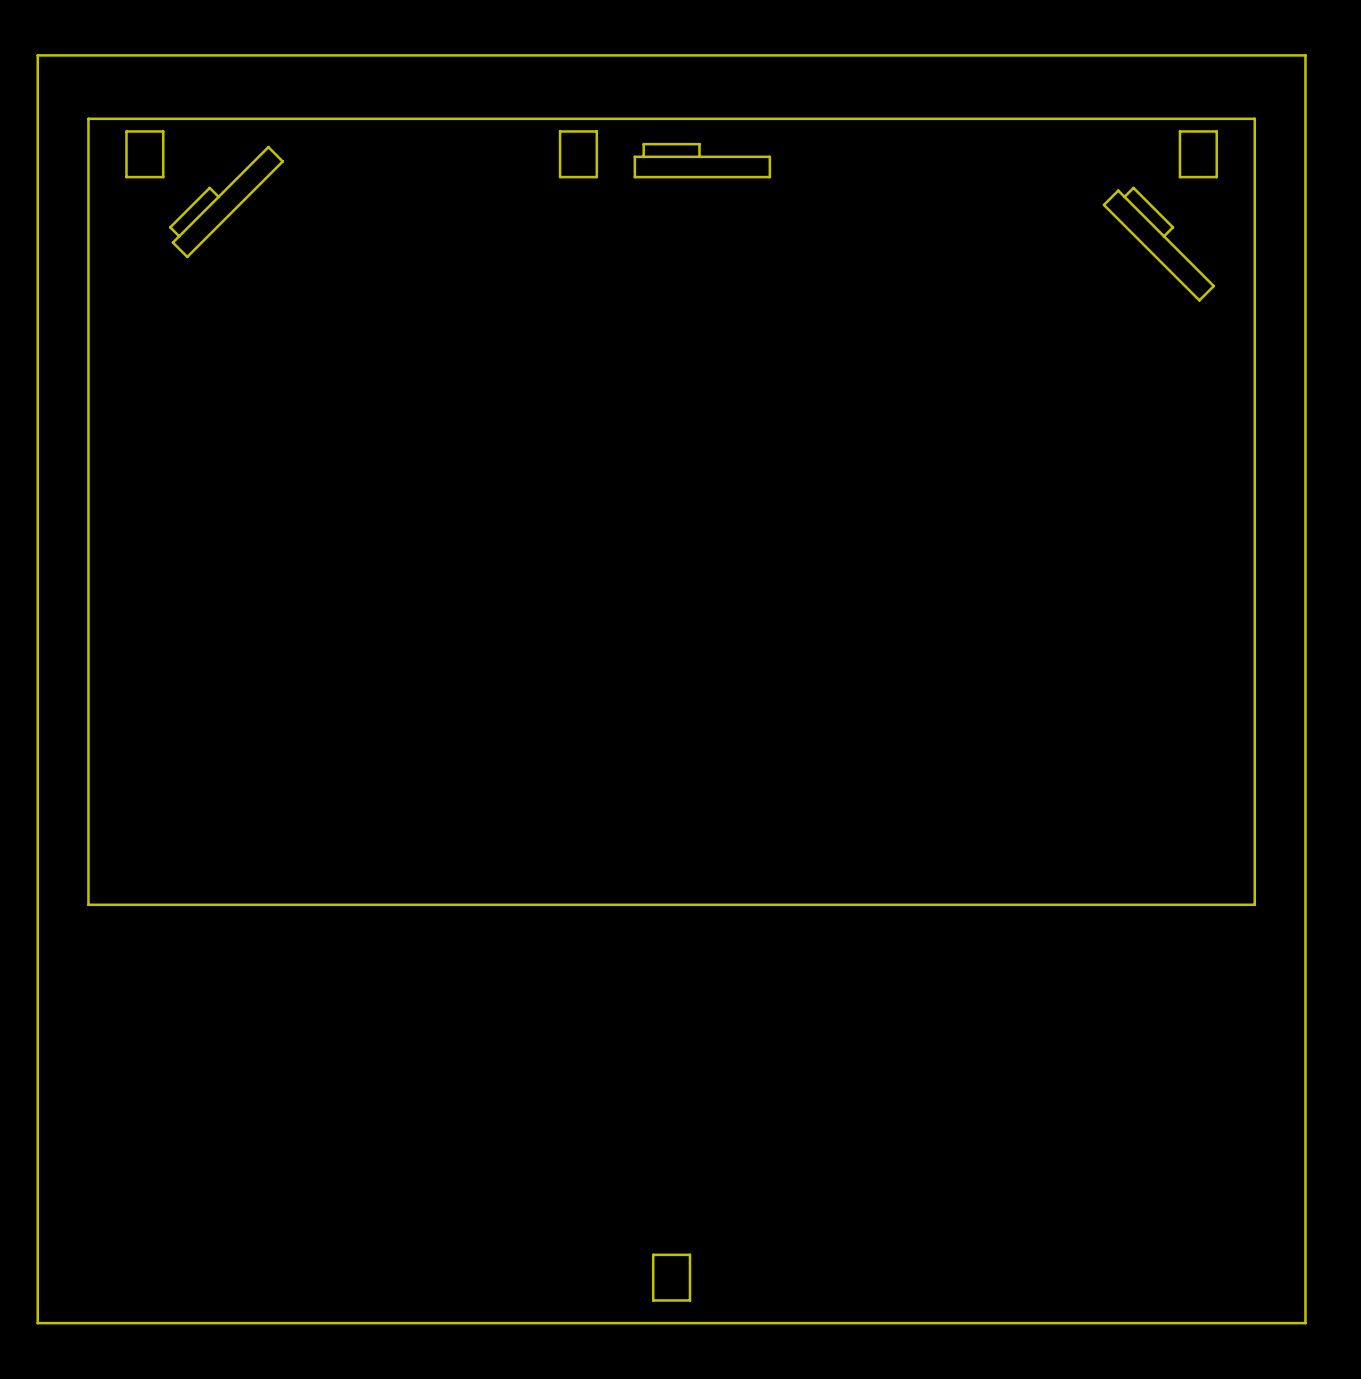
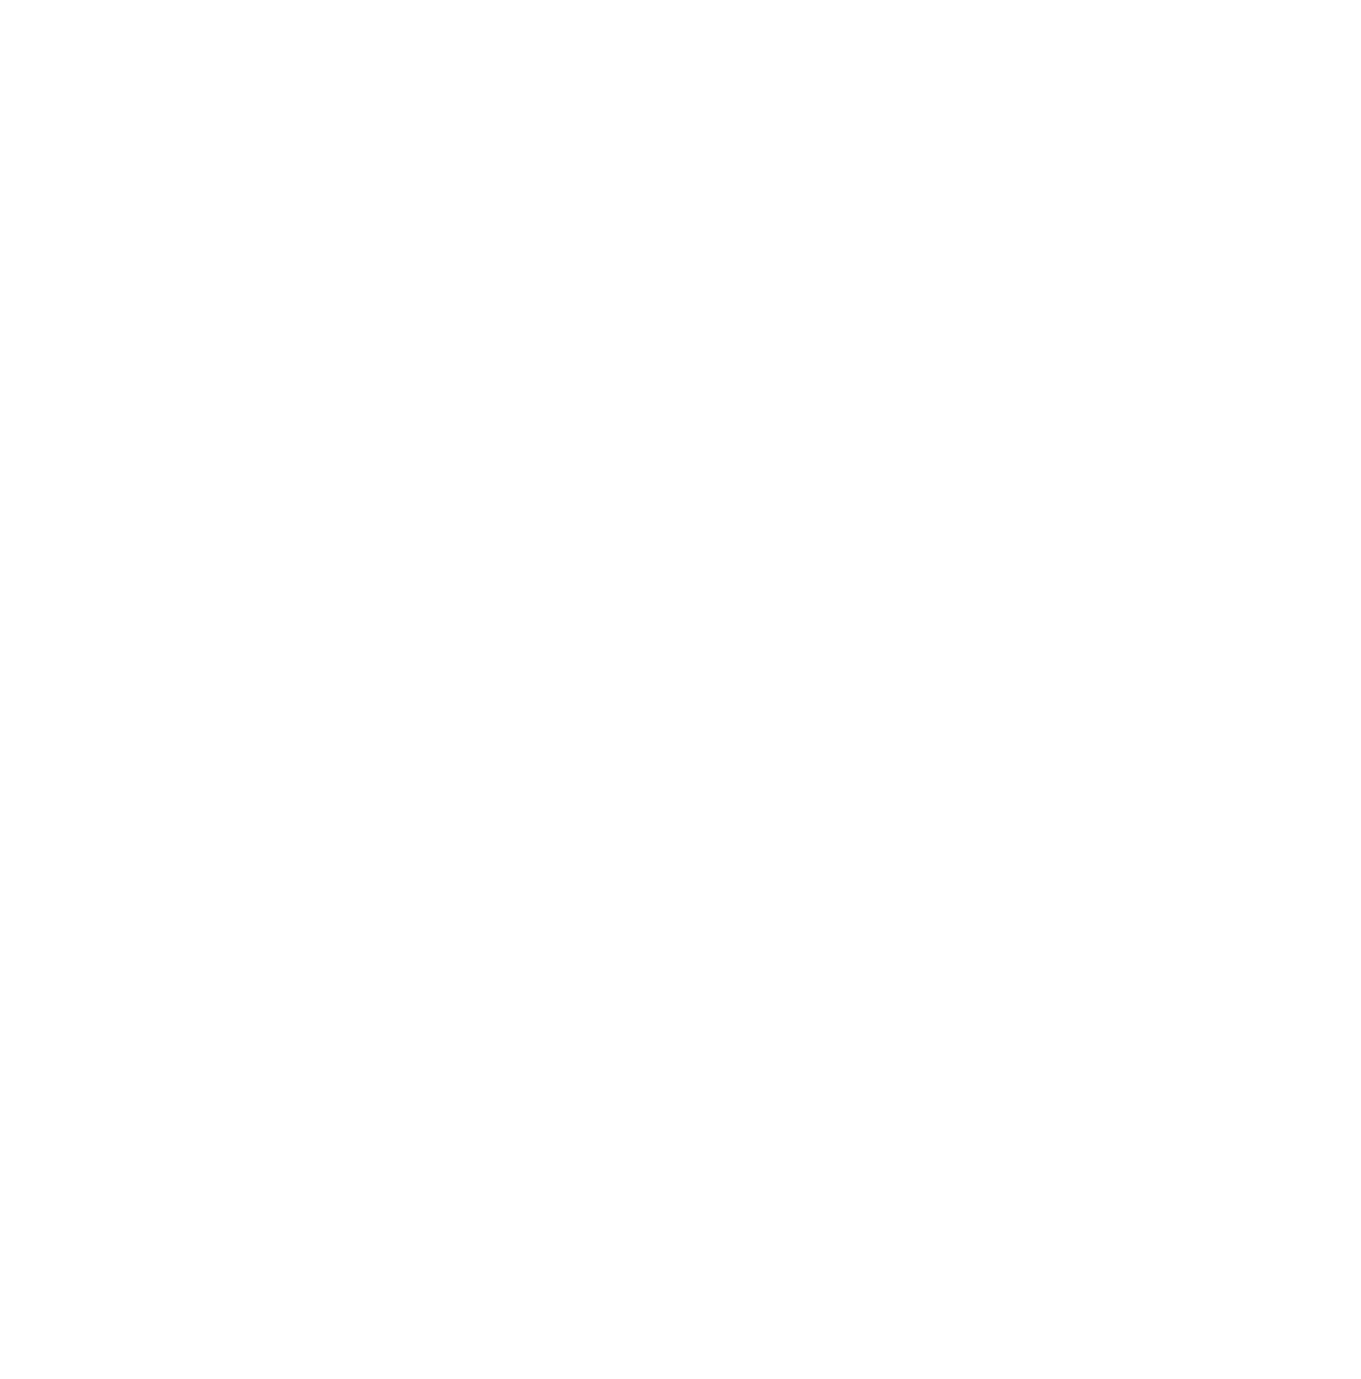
board edge: (37, 55) (37, 1323) (1305, 1323) (1305, 55) (37, 55) -> none
board edge: (88, 118) (88, 904) (1254, 904) (1254, 118) (88, 118) -> none
board edge: (126, 131) (163, 131) (163, 177) (126, 177) (126, 131) -> none
board edge: (560, 131) (596, 131) (596, 177) (560, 177) (560, 131) -> none
board edge: (1179, 131) (1216, 131) (1216, 177) (1179, 177) (1179, 131) -> none
board edge: (268, 147) (172, 242) (187, 256) (282, 161) (268, 147) -> none
board edge: (634, 156) (769, 156) (769, 177) (634, 177) (634, 156) -> none
board edge: (643, 156) (643, 144) (699, 144) (699, 156) -> none
board edge: (1118, 190) (1103, 204) (1199, 300) (1213, 286) (1118, 190) -> none
board edge: (218, 196) (209, 187) (170, 227) (179, 236) -> none
board edge: (1124, 196) (1133, 187) (1172, 227) (1164, 236) -> none
board edge: (653, 1254) (653, 1300) (689, 1300) (689, 1254) (653, 1254) -> none

